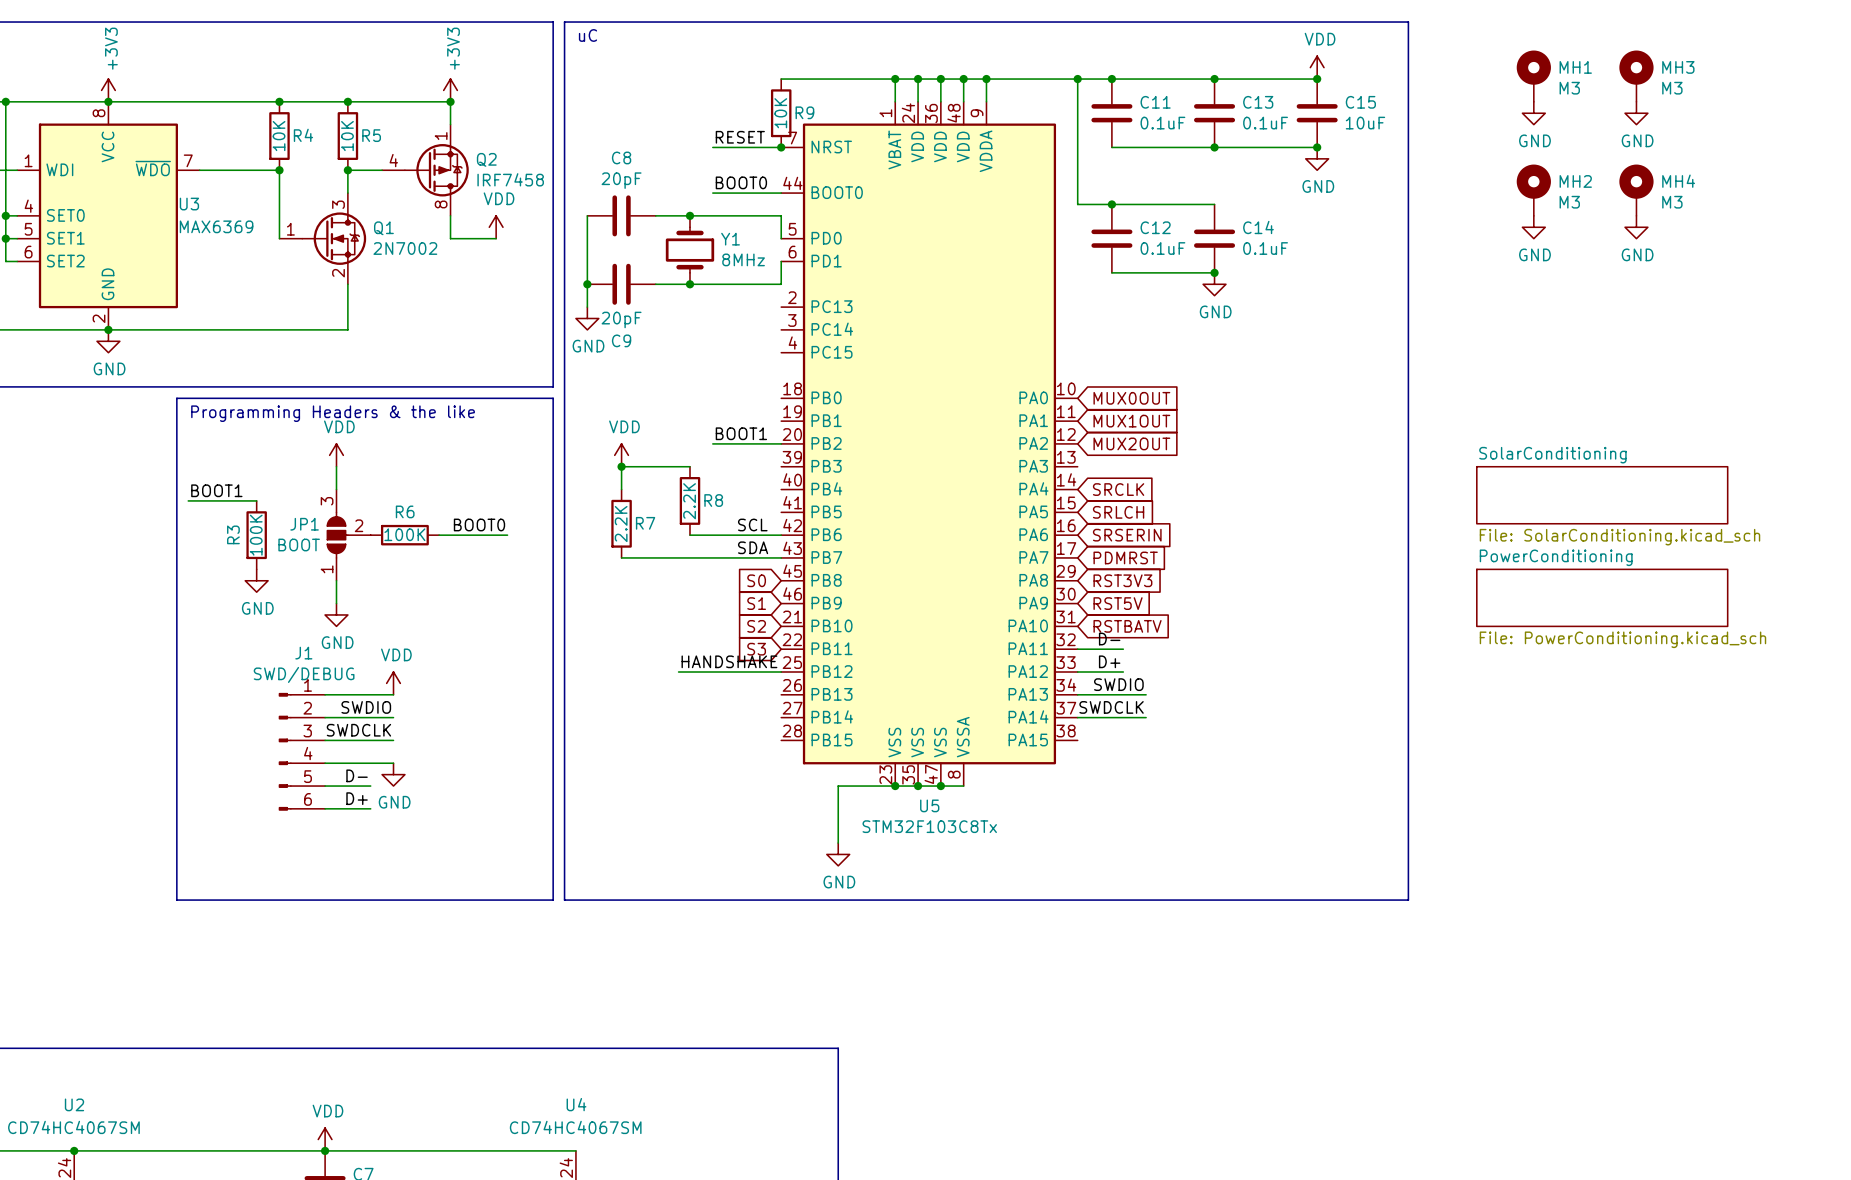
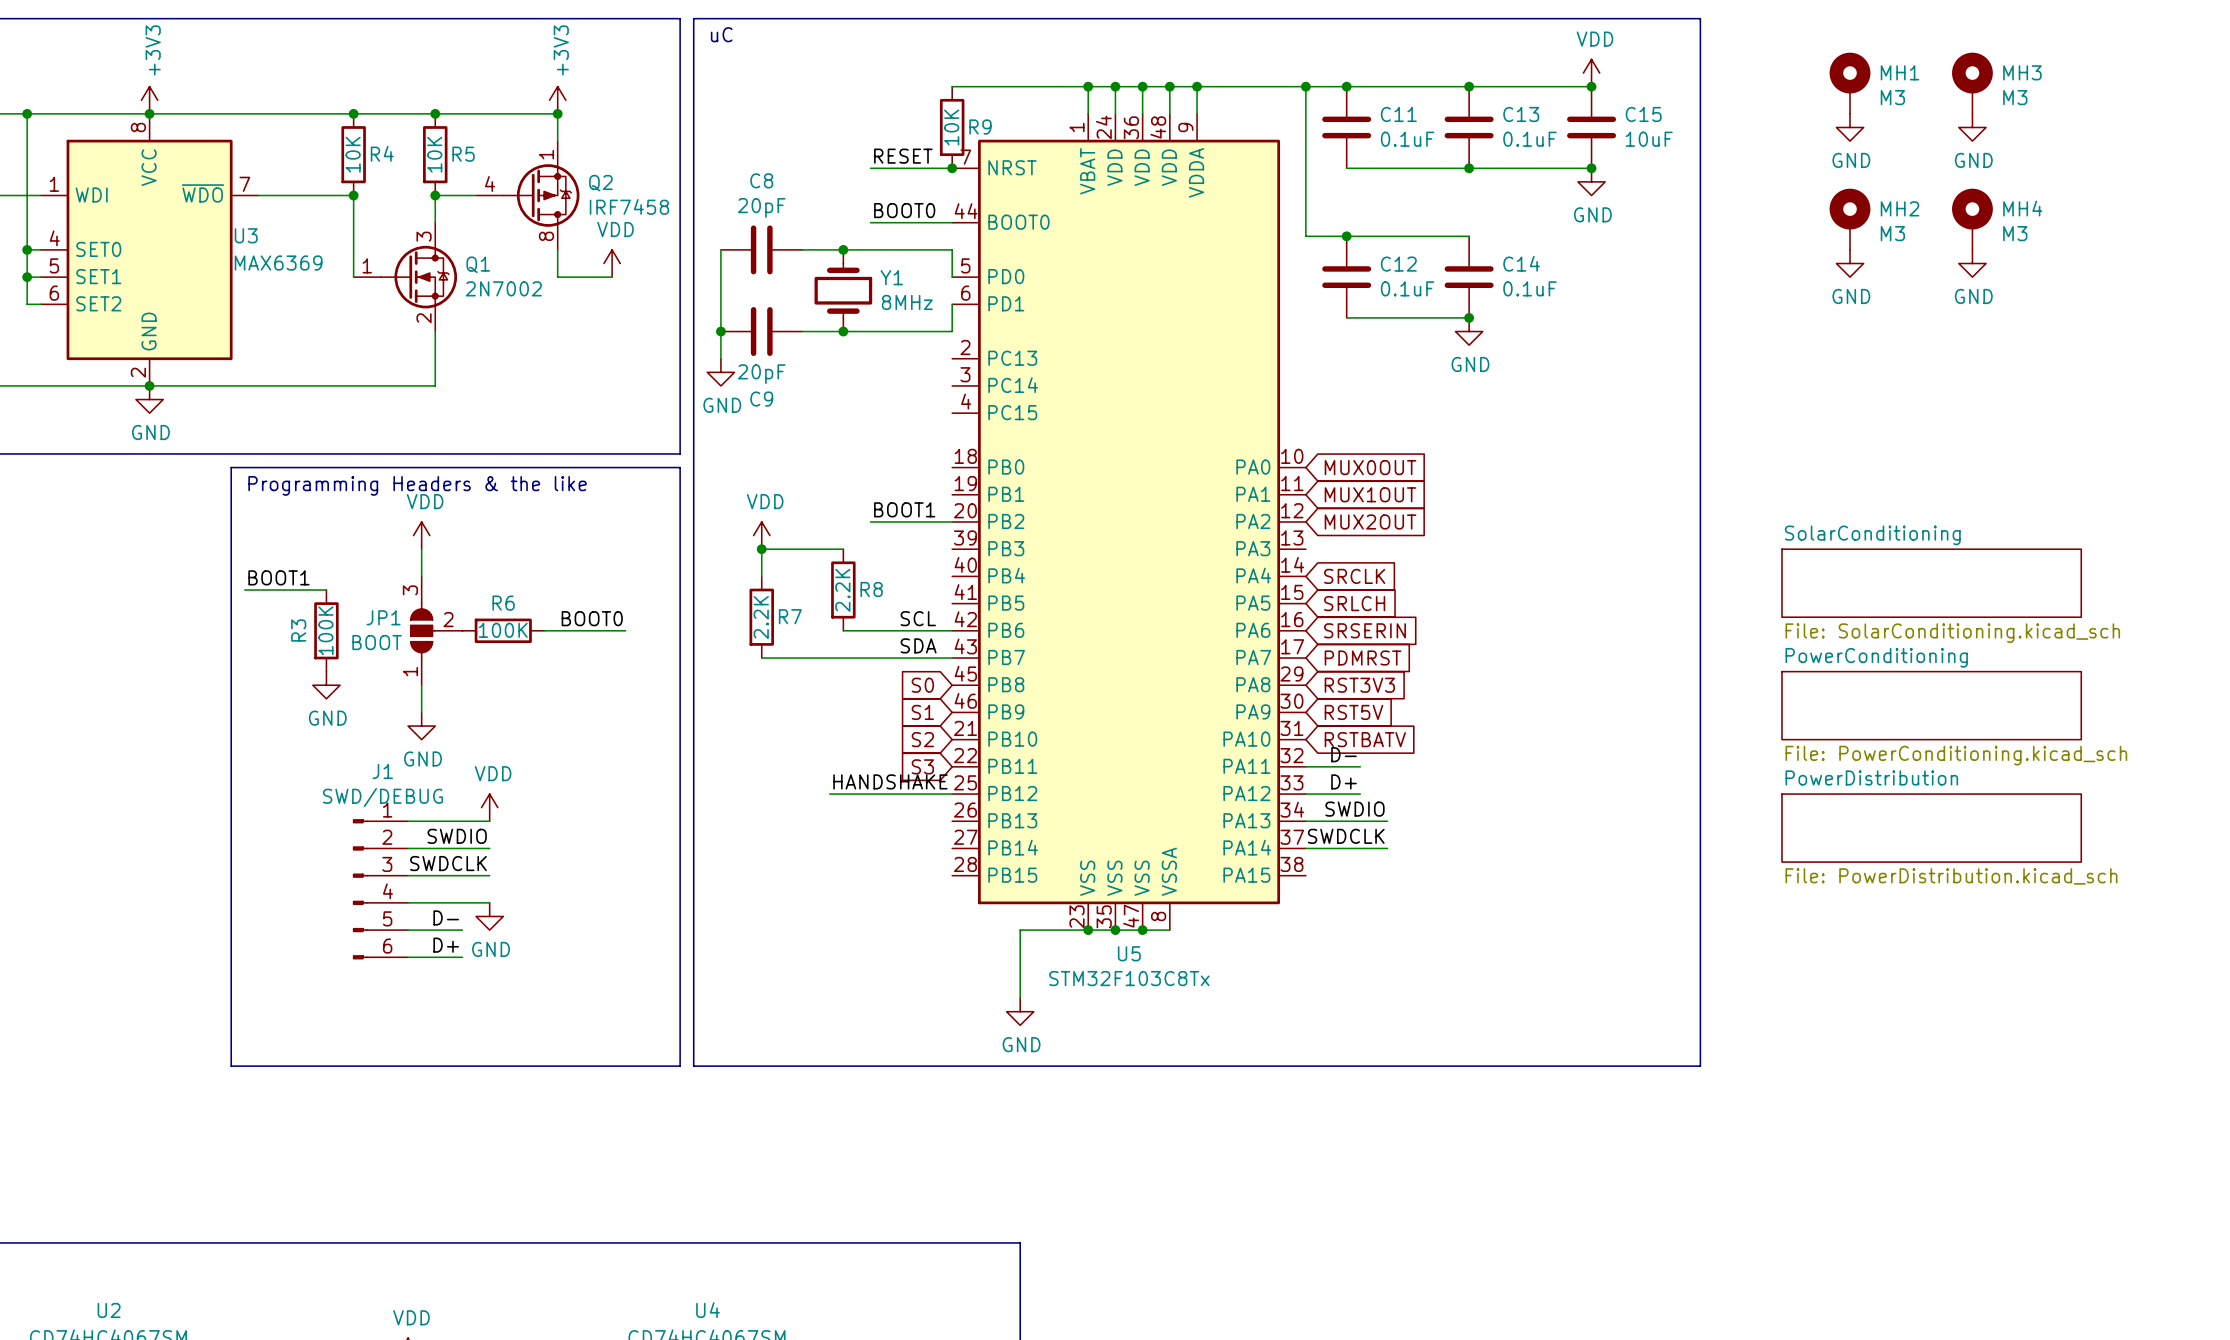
sheet PowerDistribution: none -> File: PowerDistribution.kicad_sch (1931, 828)

